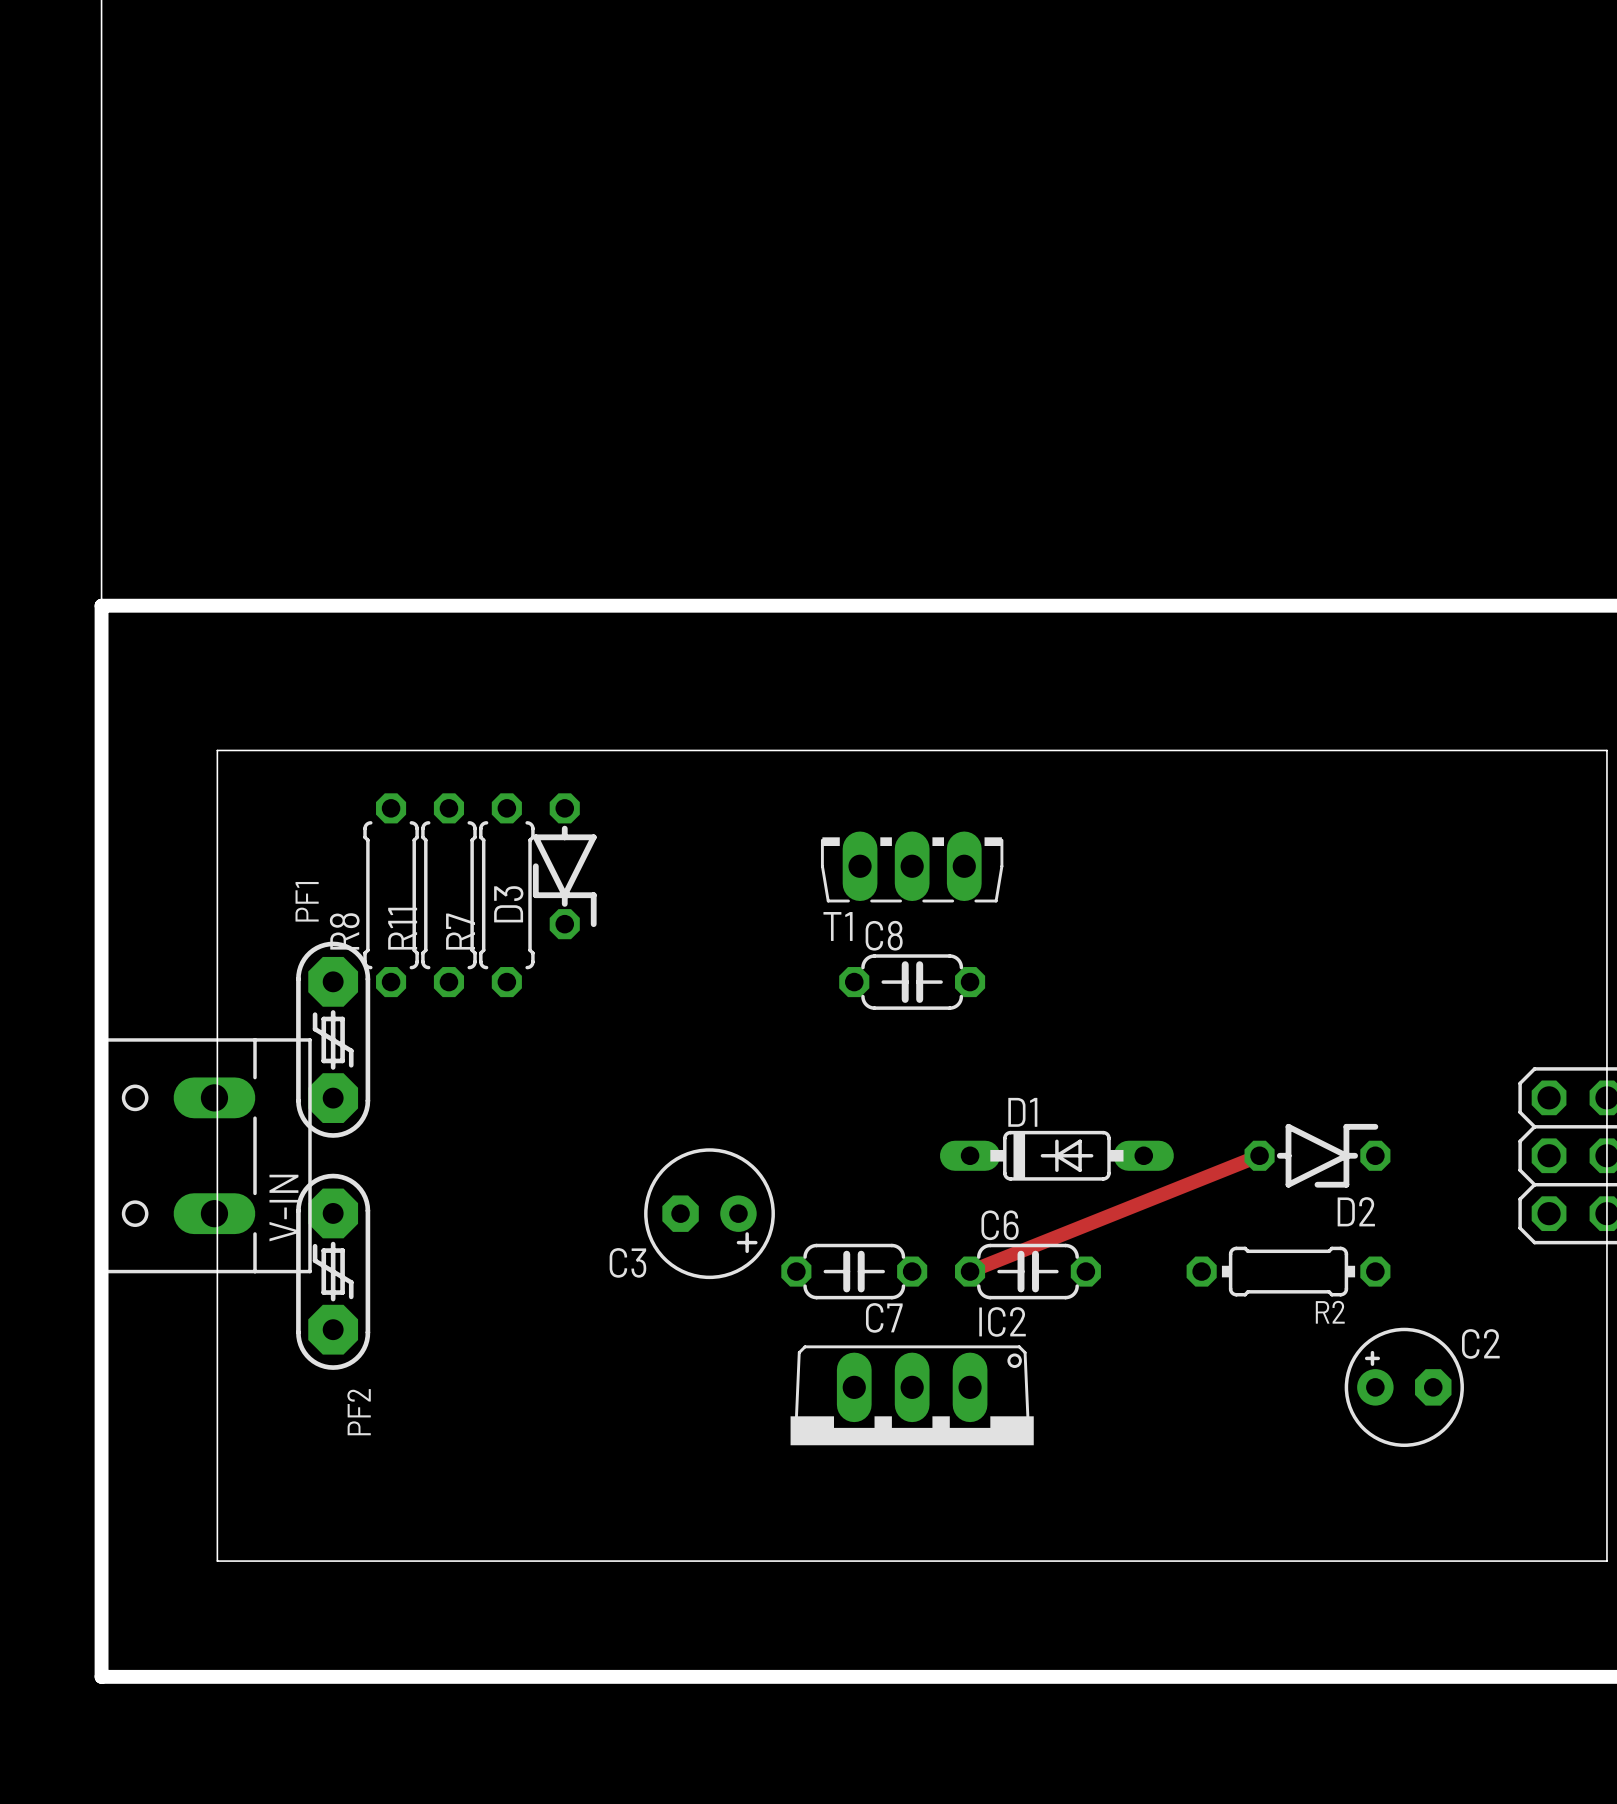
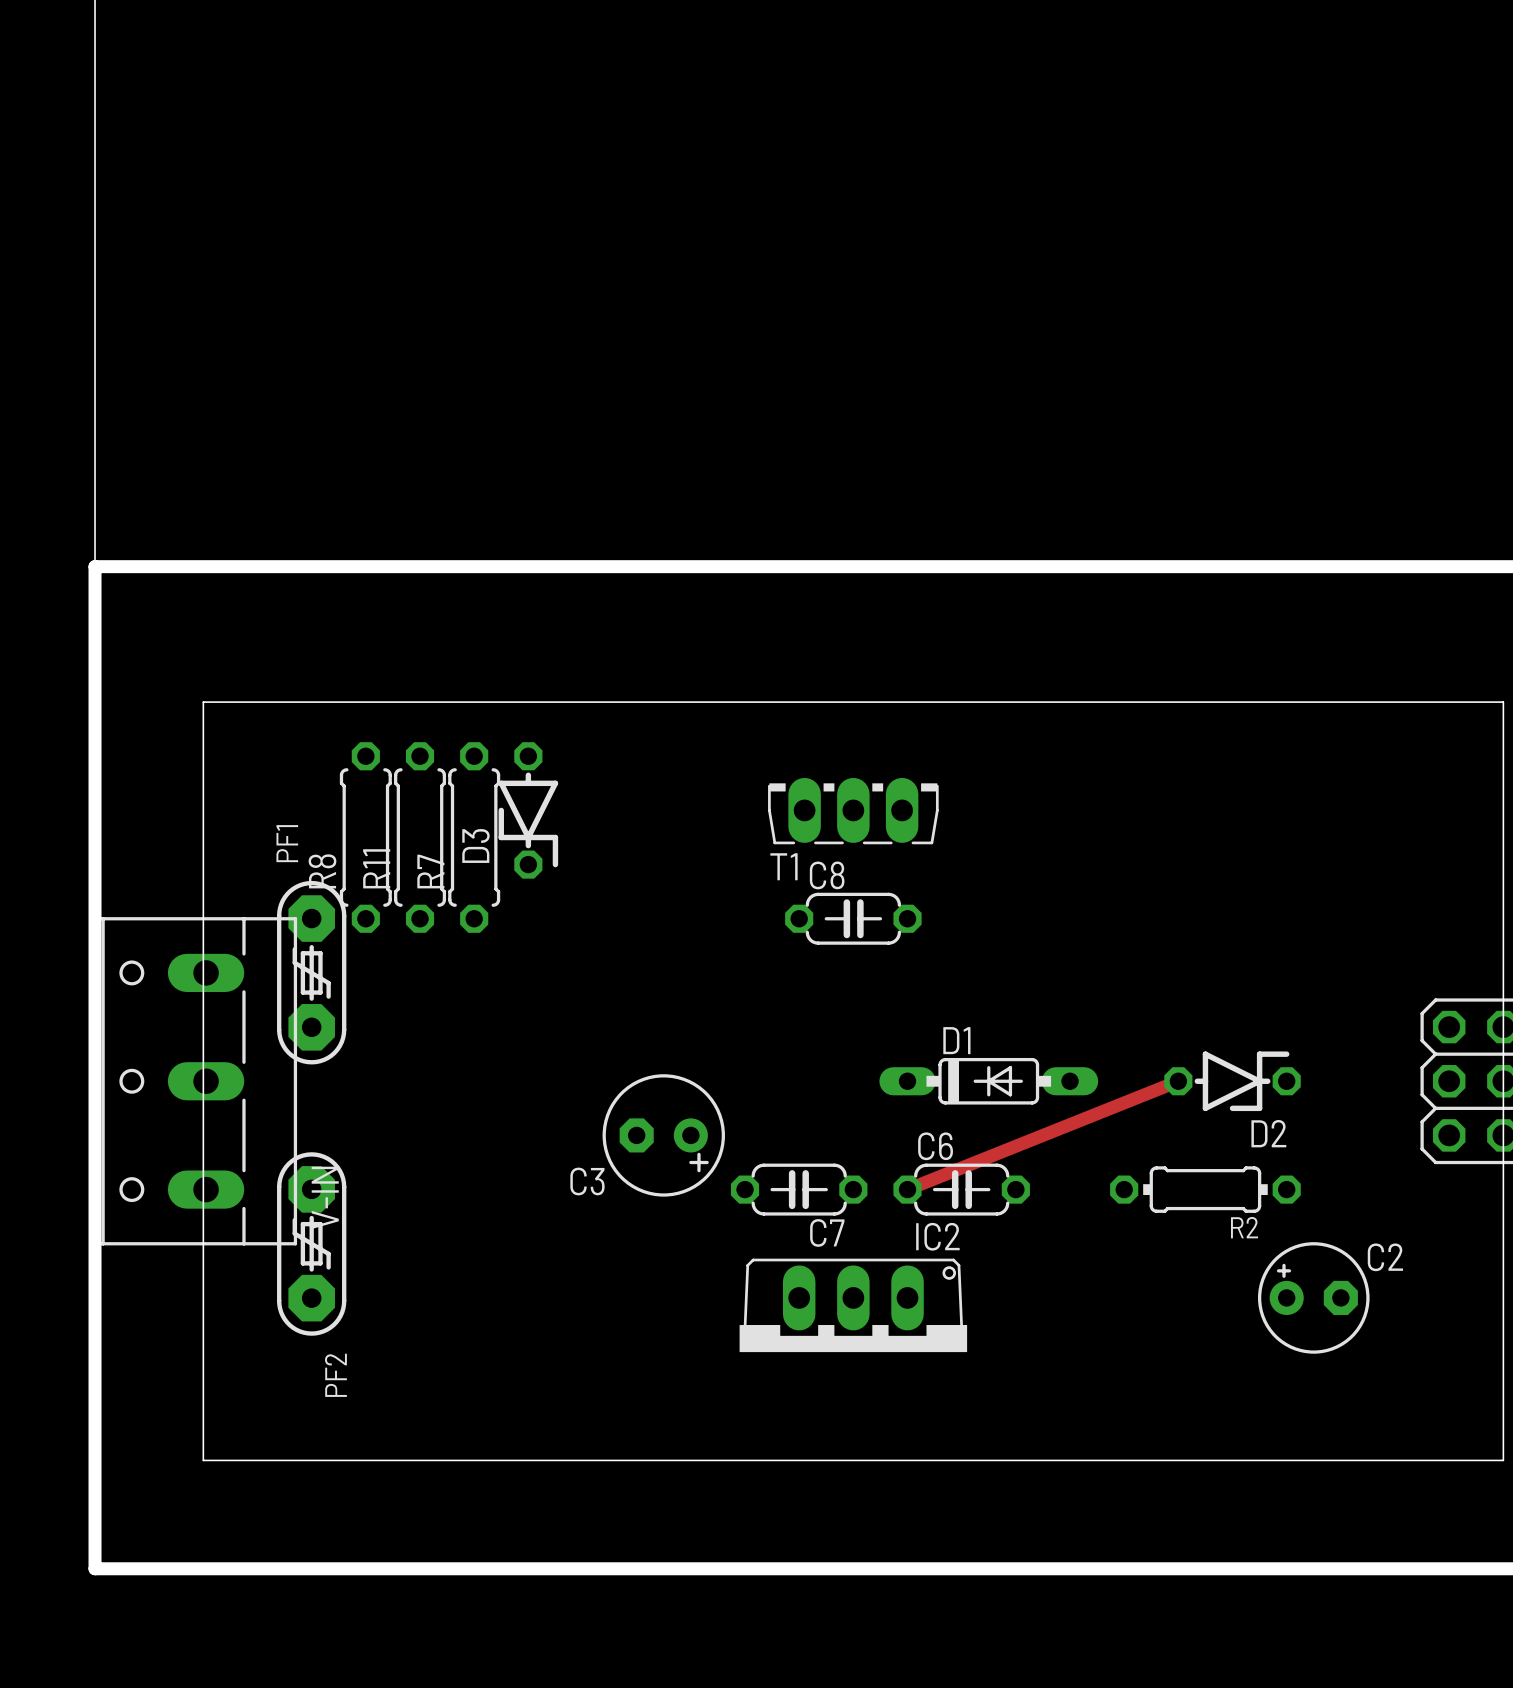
V-IN footprint: [96, 1038, 312, 1274] -> [96, 917, 298, 1246]
V-IN name position: V-IN (283, 1208) -> V-IN (325, 1197)
PF2 position: (333, 1271) -> (311, 1243)

